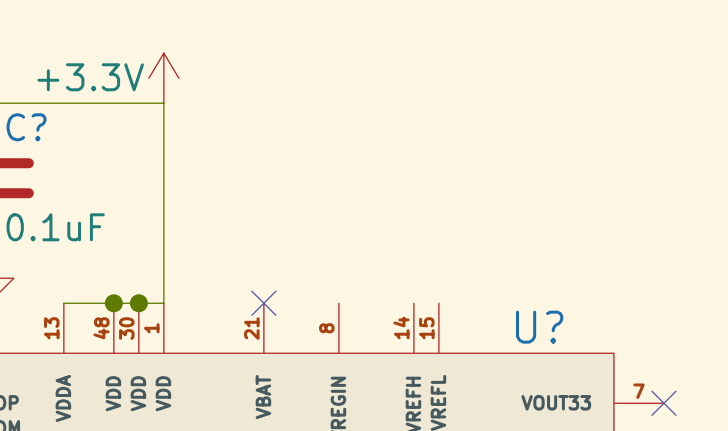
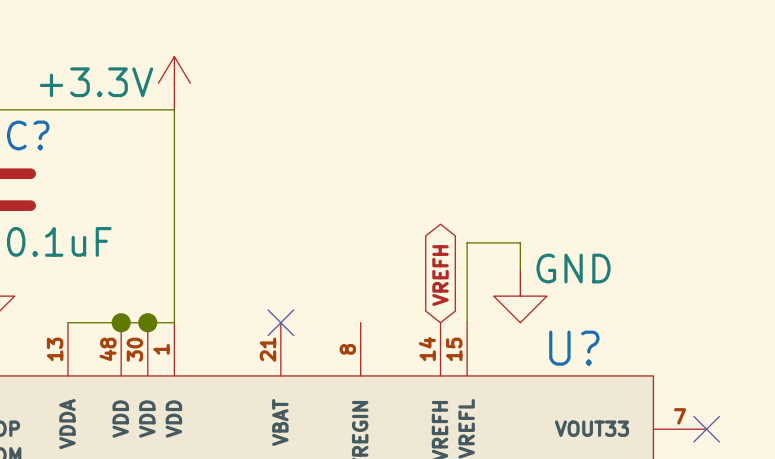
wire: none -> (520, 269) (520, 242) (467, 242) (467, 322)
global label: none -> VREFH (440, 275)
power symbol: none -> GND (520, 296)

